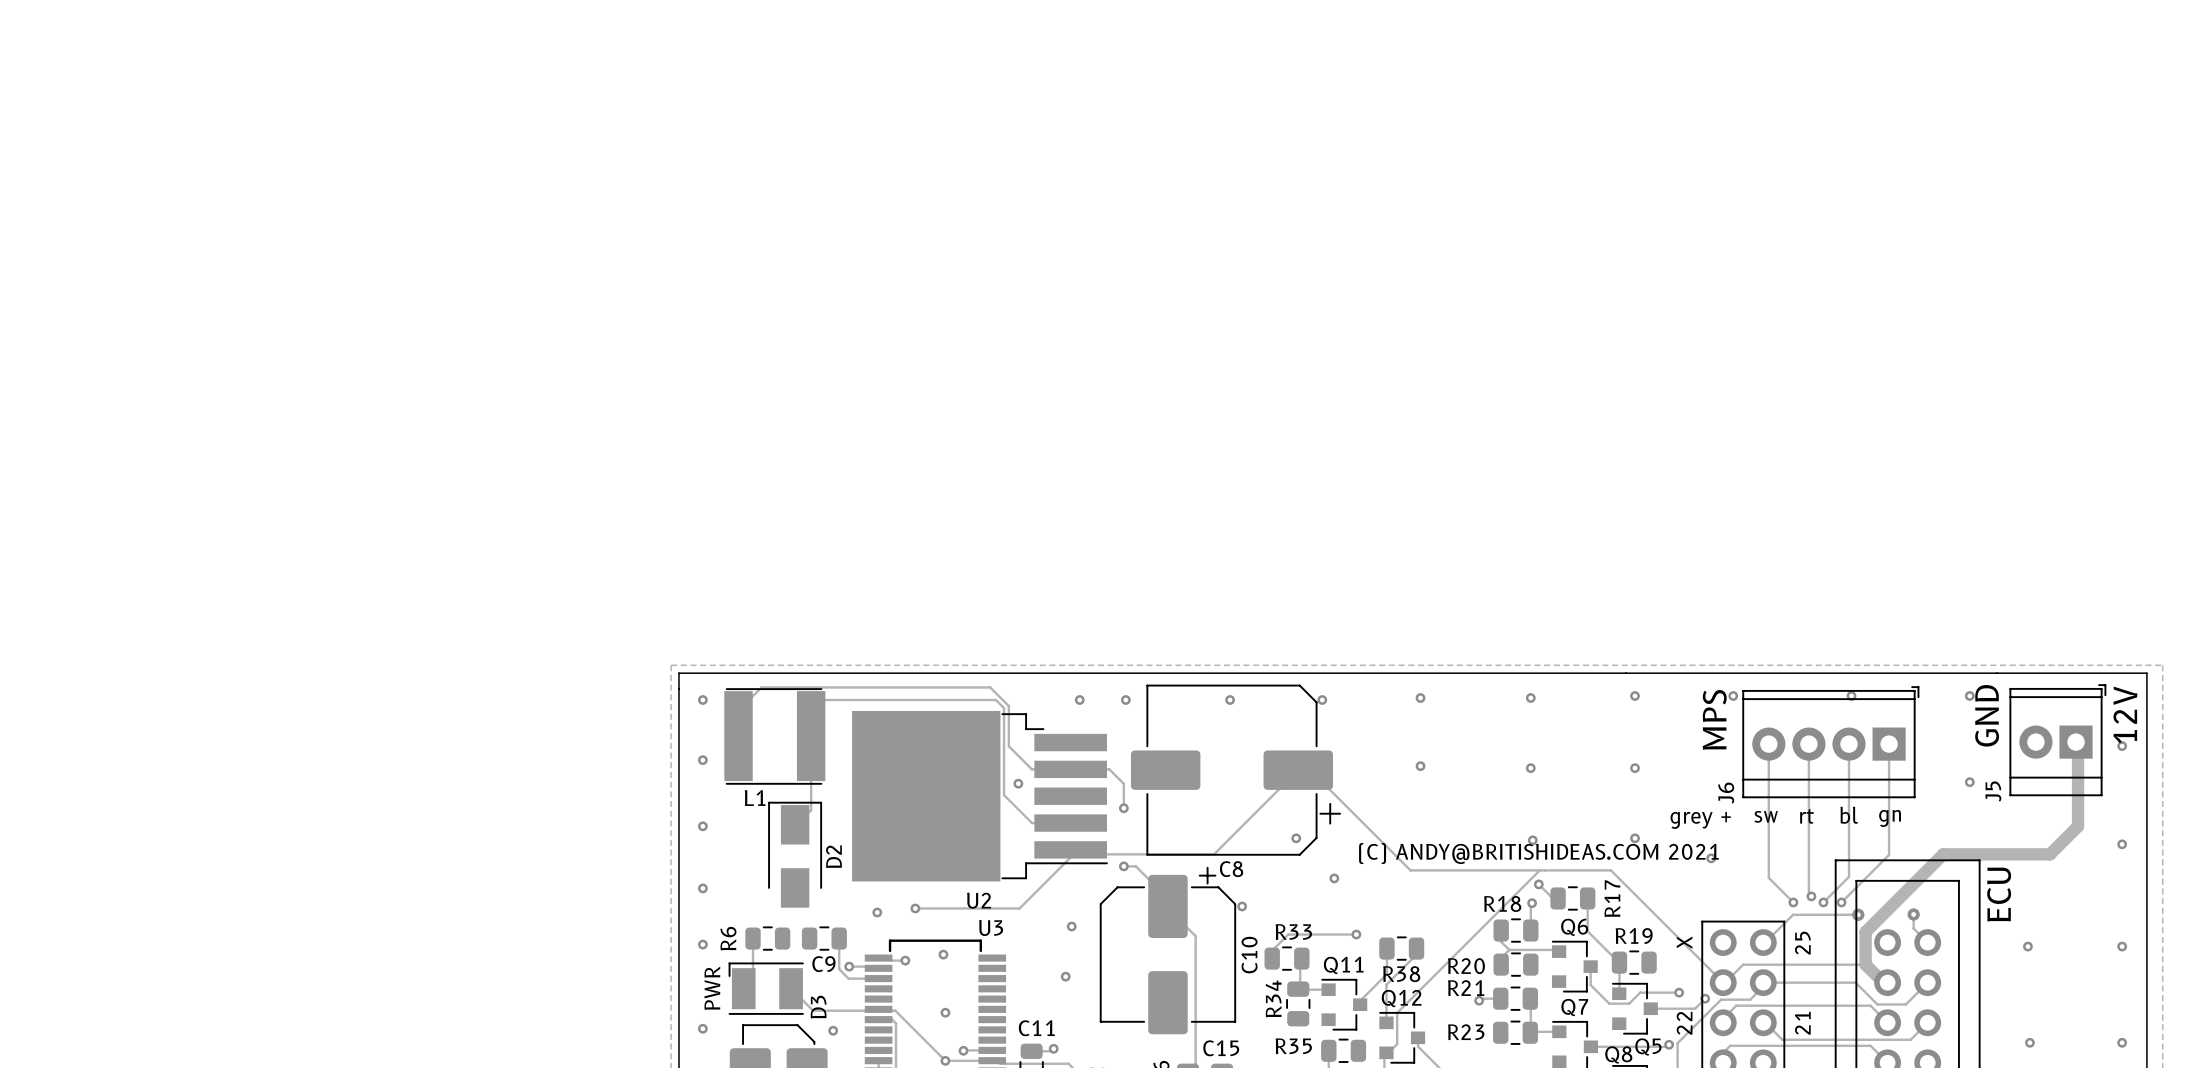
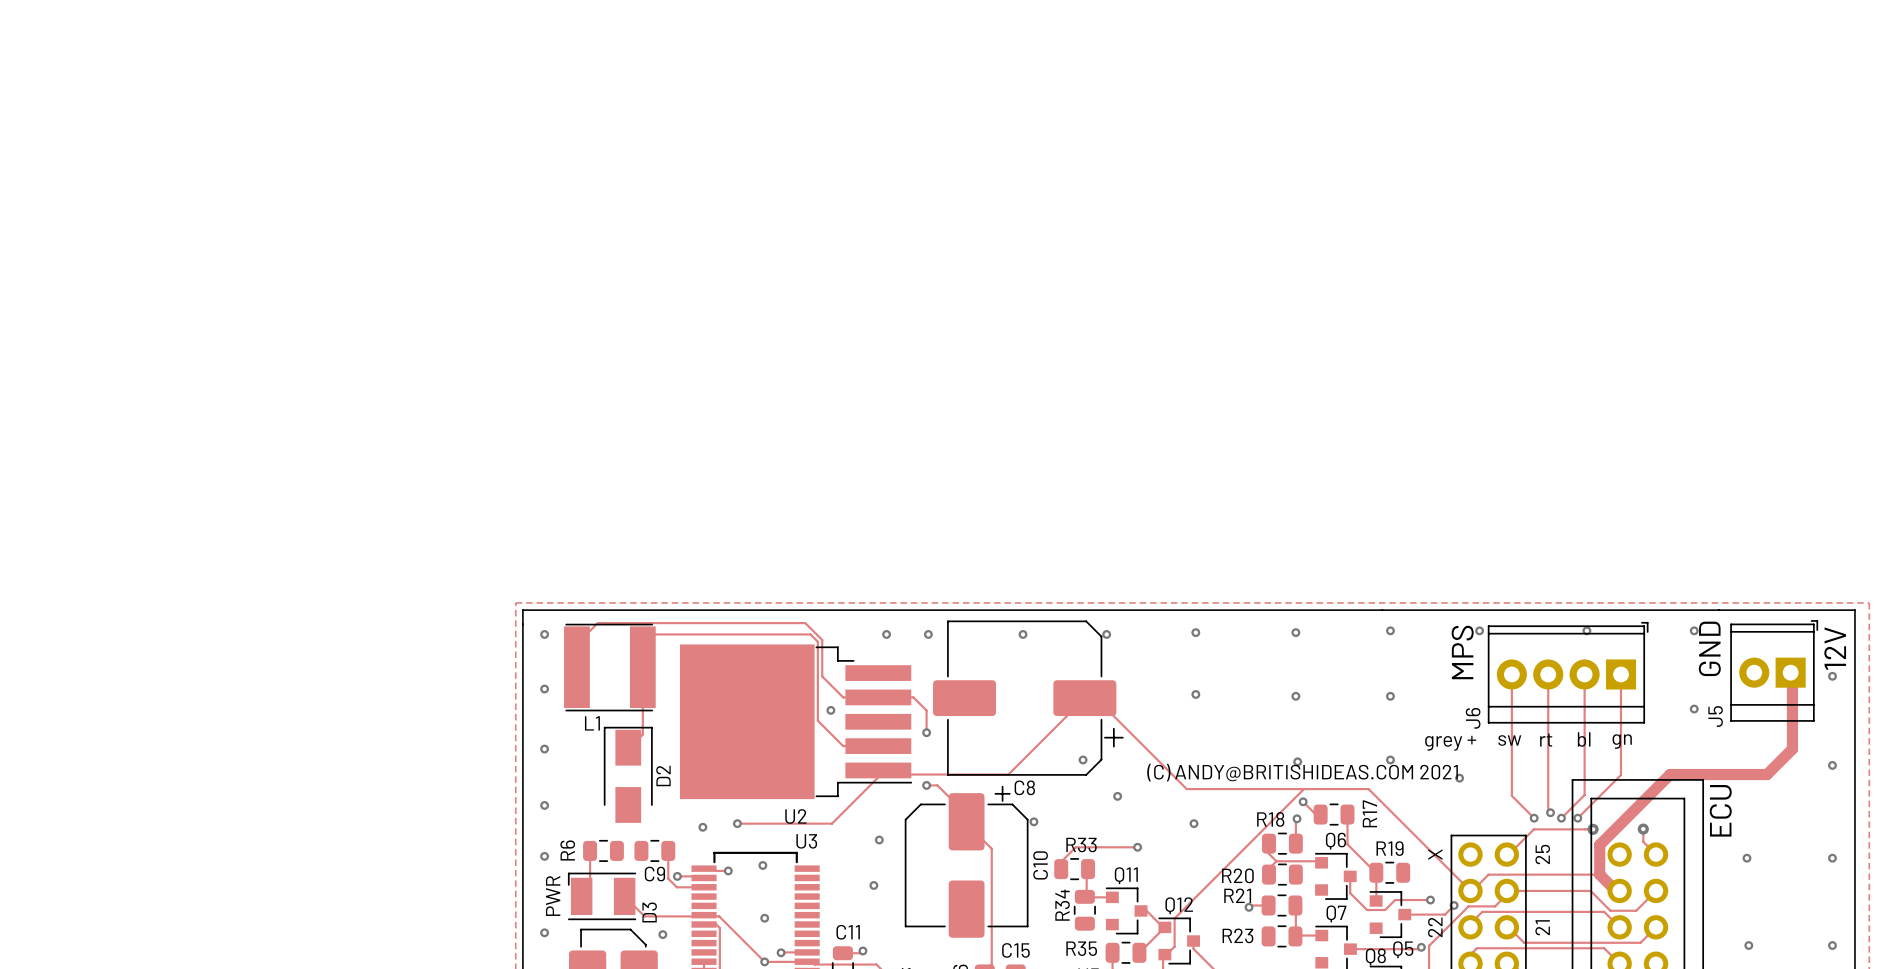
via: none -> (1194, 823)
track: (1386, 948) (1386, 974) (1360, 1000) -> none
R38: (1401, 948) -> none
track: (1414, 956) (1386, 984) (1386, 1022) -> (1141, 950) (1164, 927)
track: none -> (1141, 910) (1146, 910) (1163, 927)

